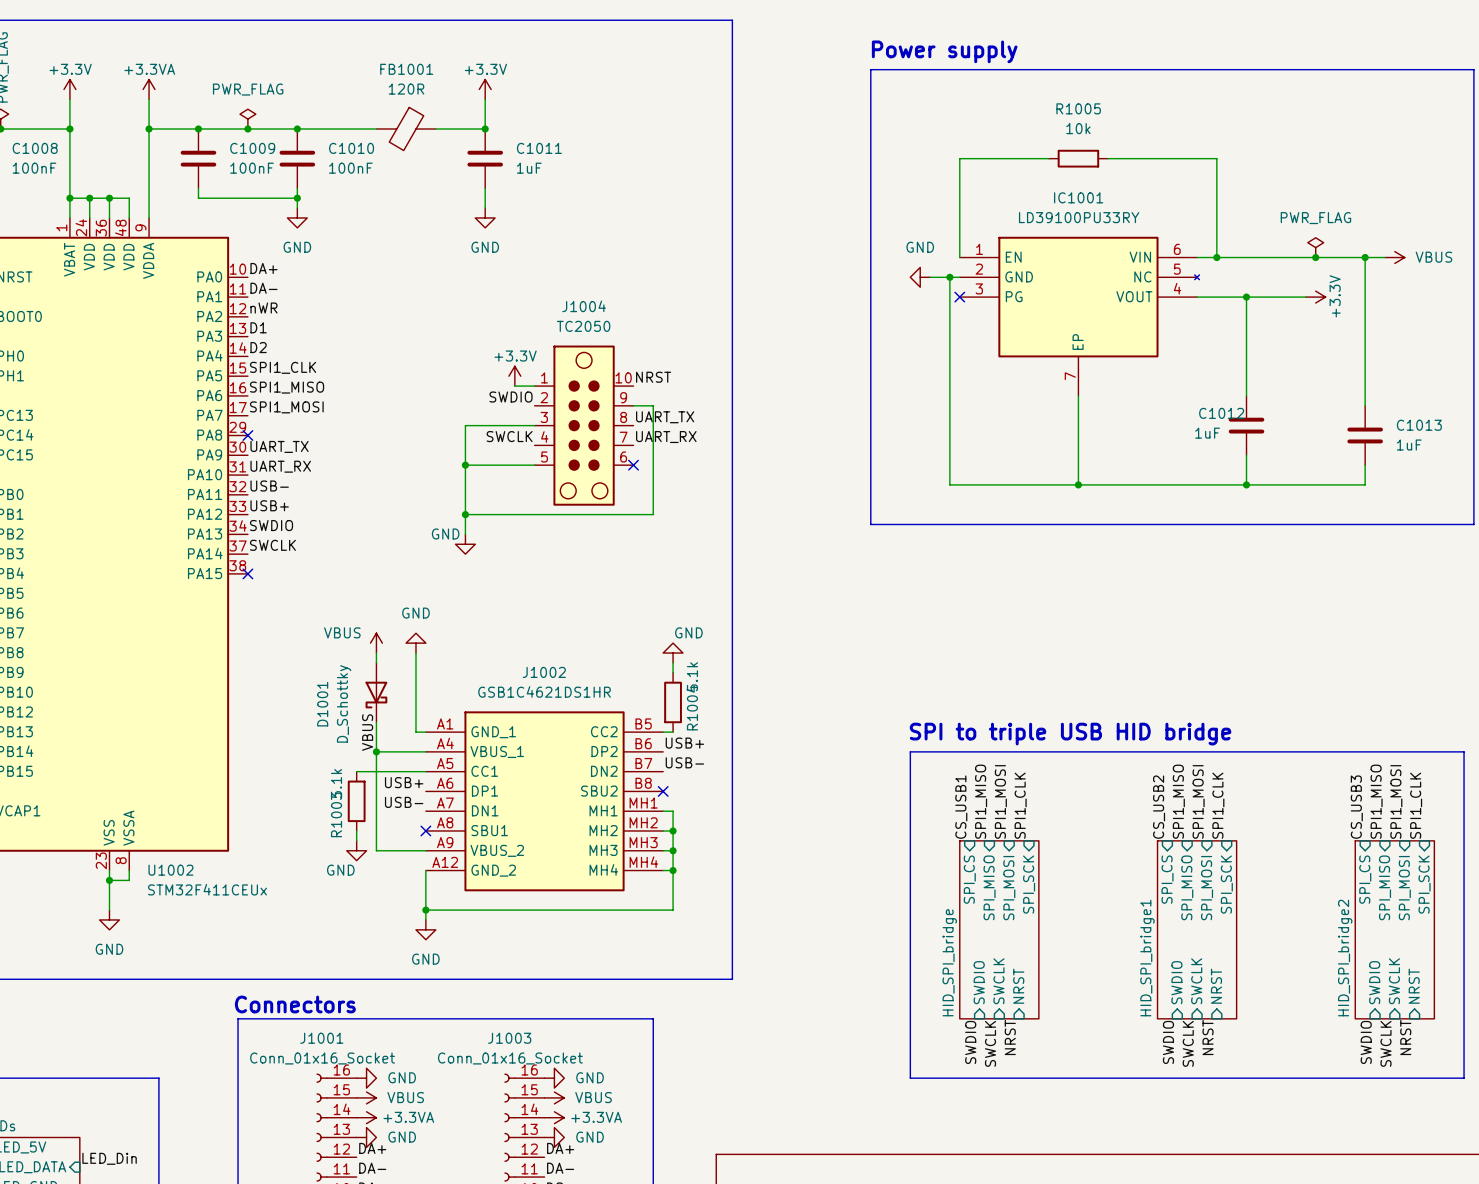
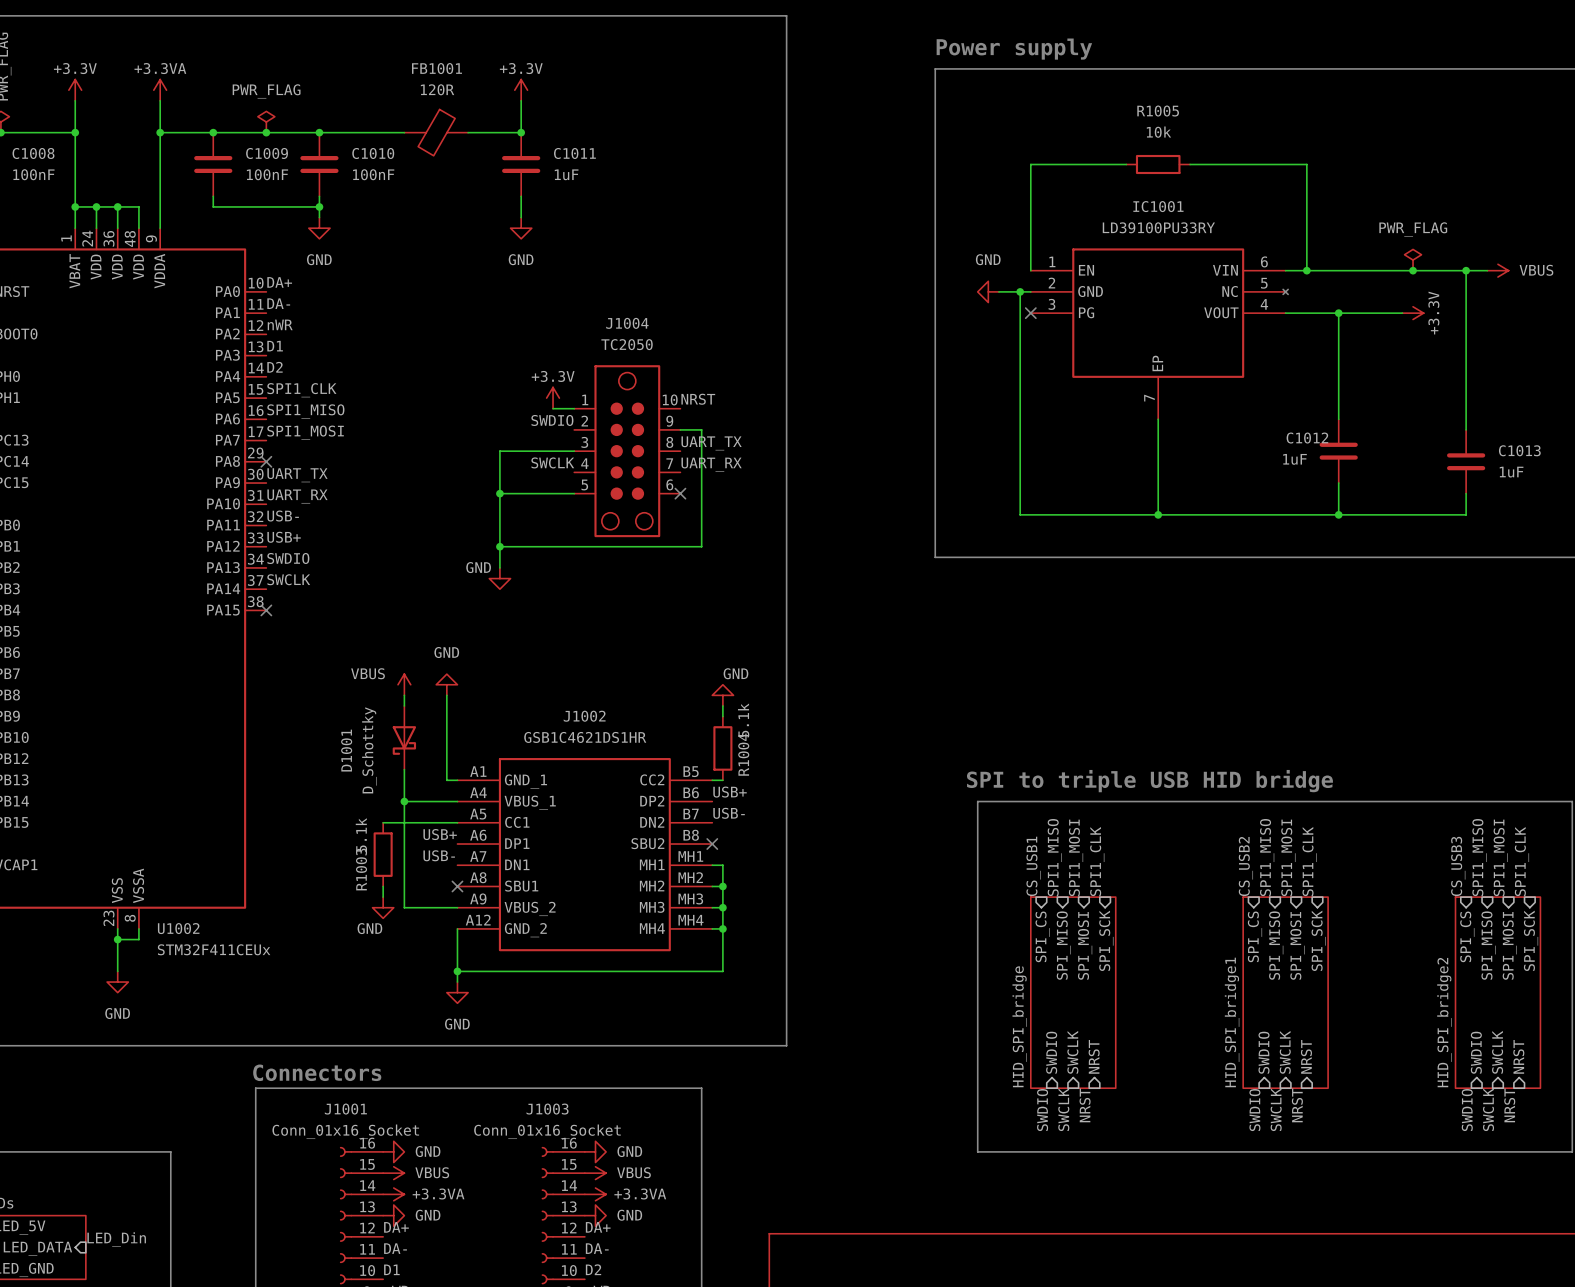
label: VBUS (367, 732) -> none

